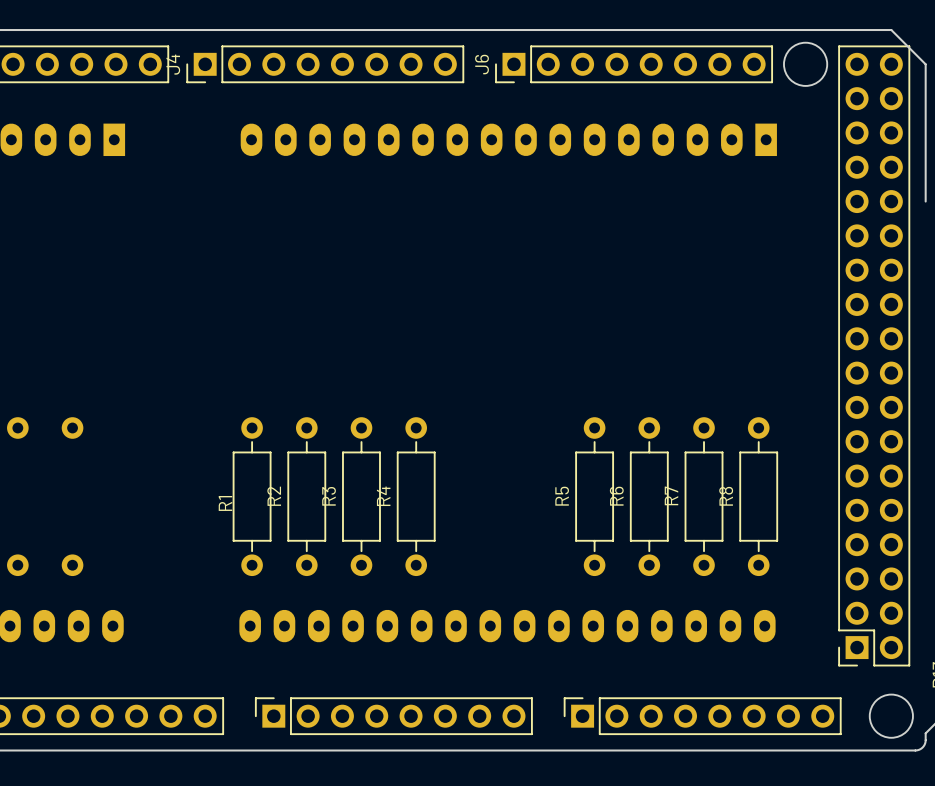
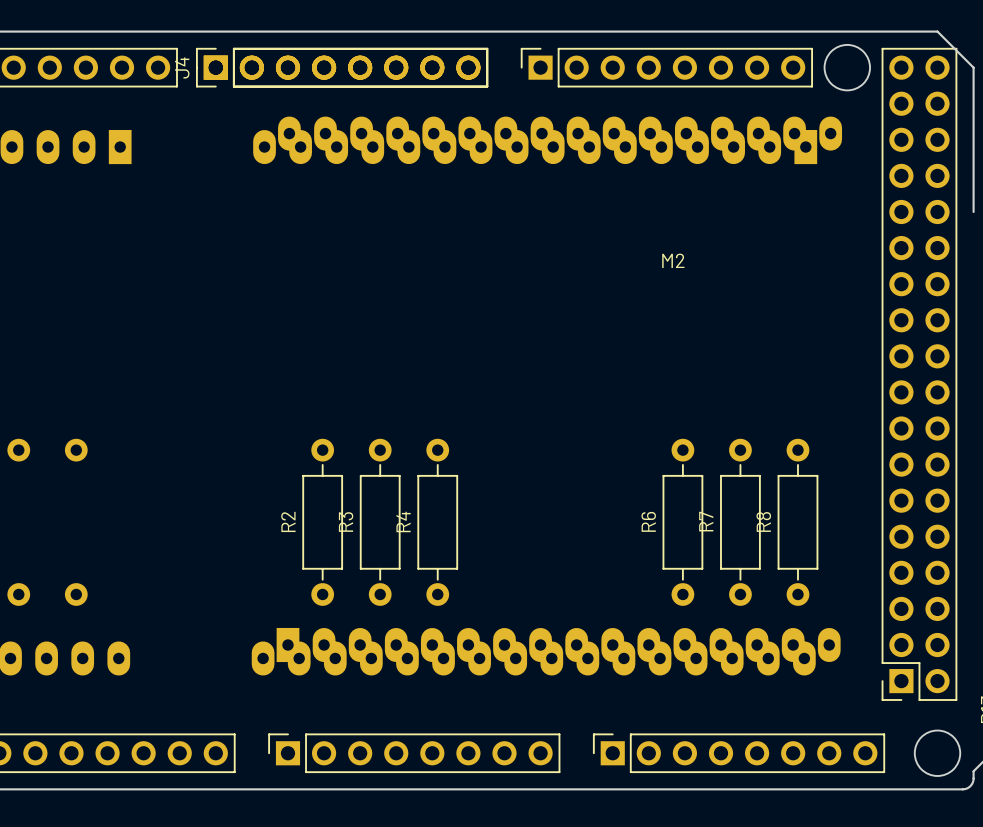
part: none -> (342, 67)
J6: (634, 64) -> none
part: none -> (666, 67)
M2: none -> (559, 389)
R1: (252, 496) -> none
R5: (594, 496) -> none

